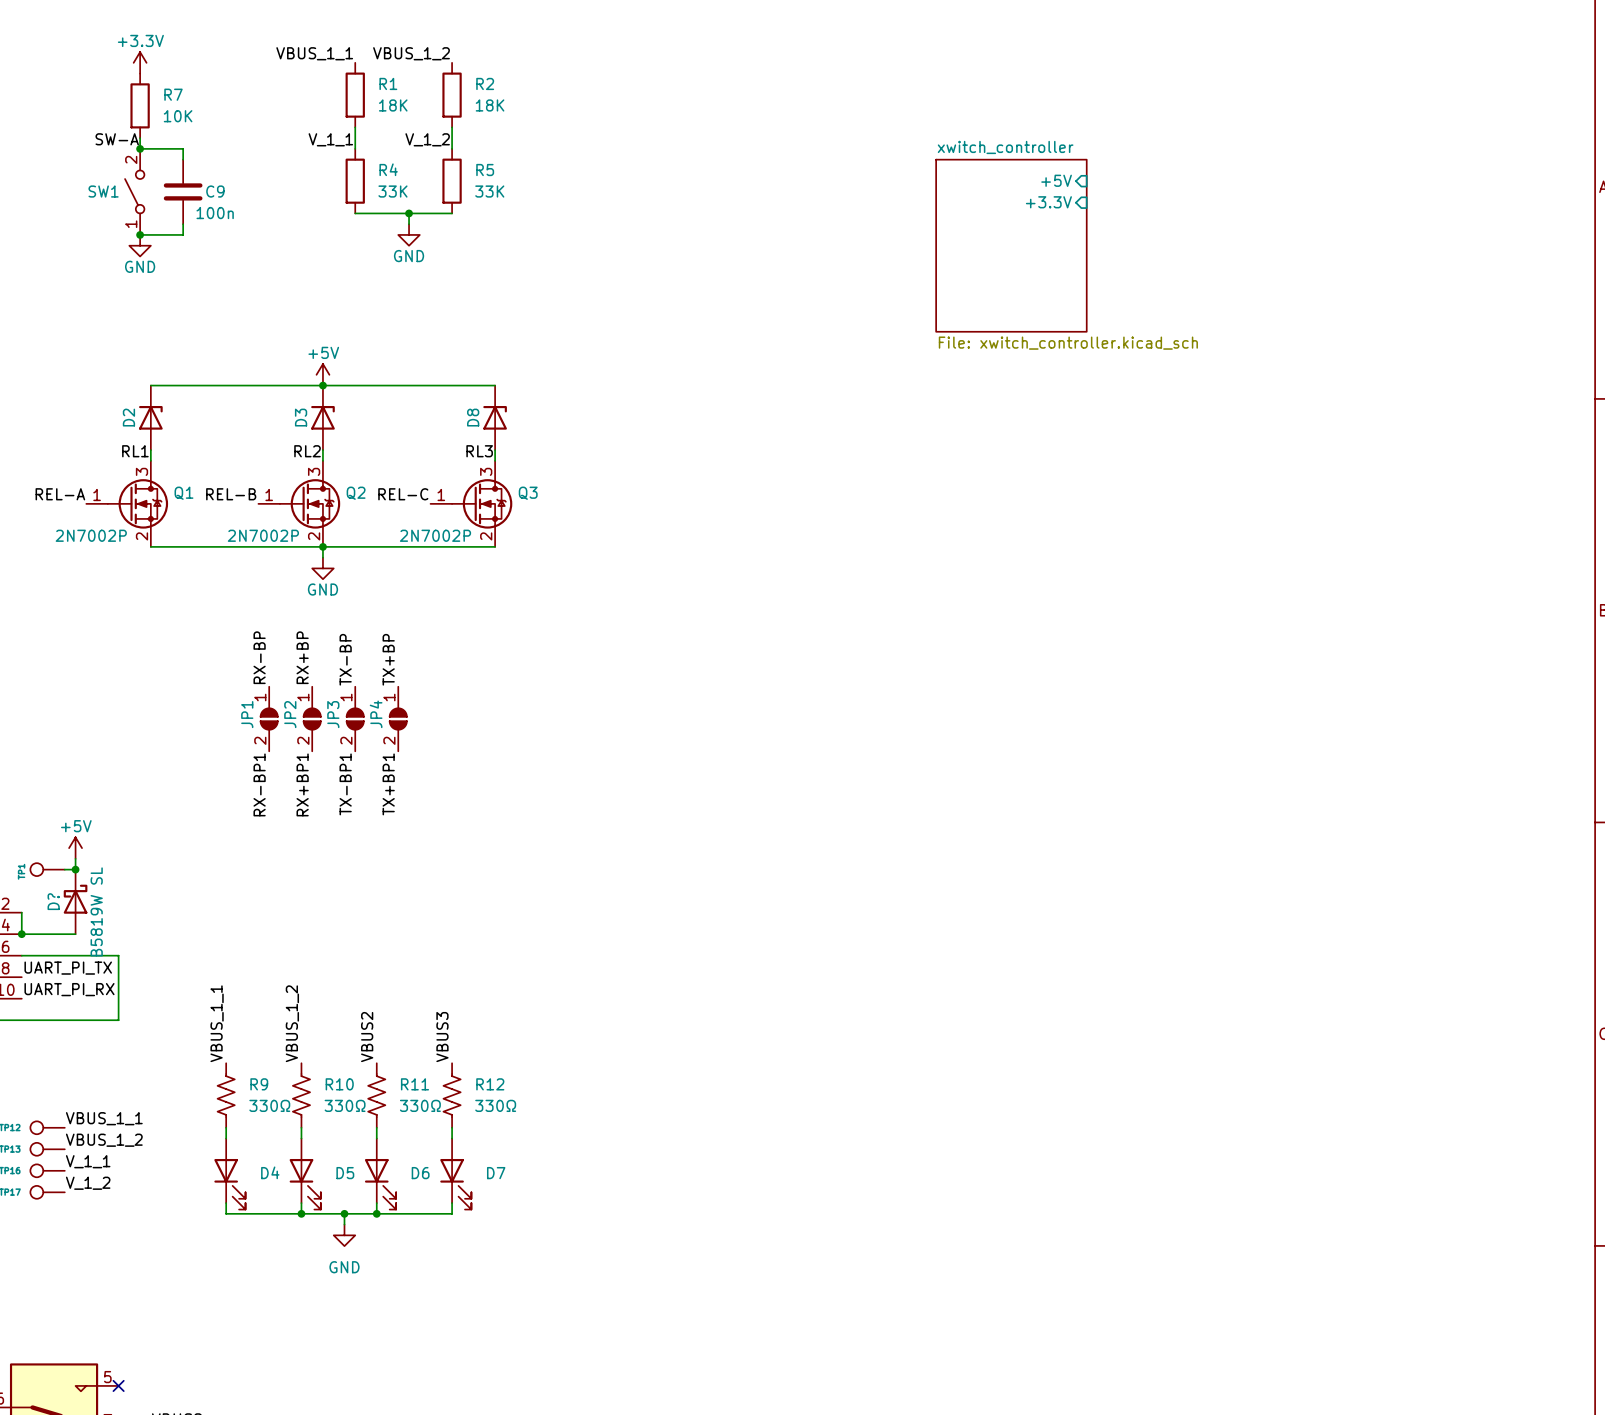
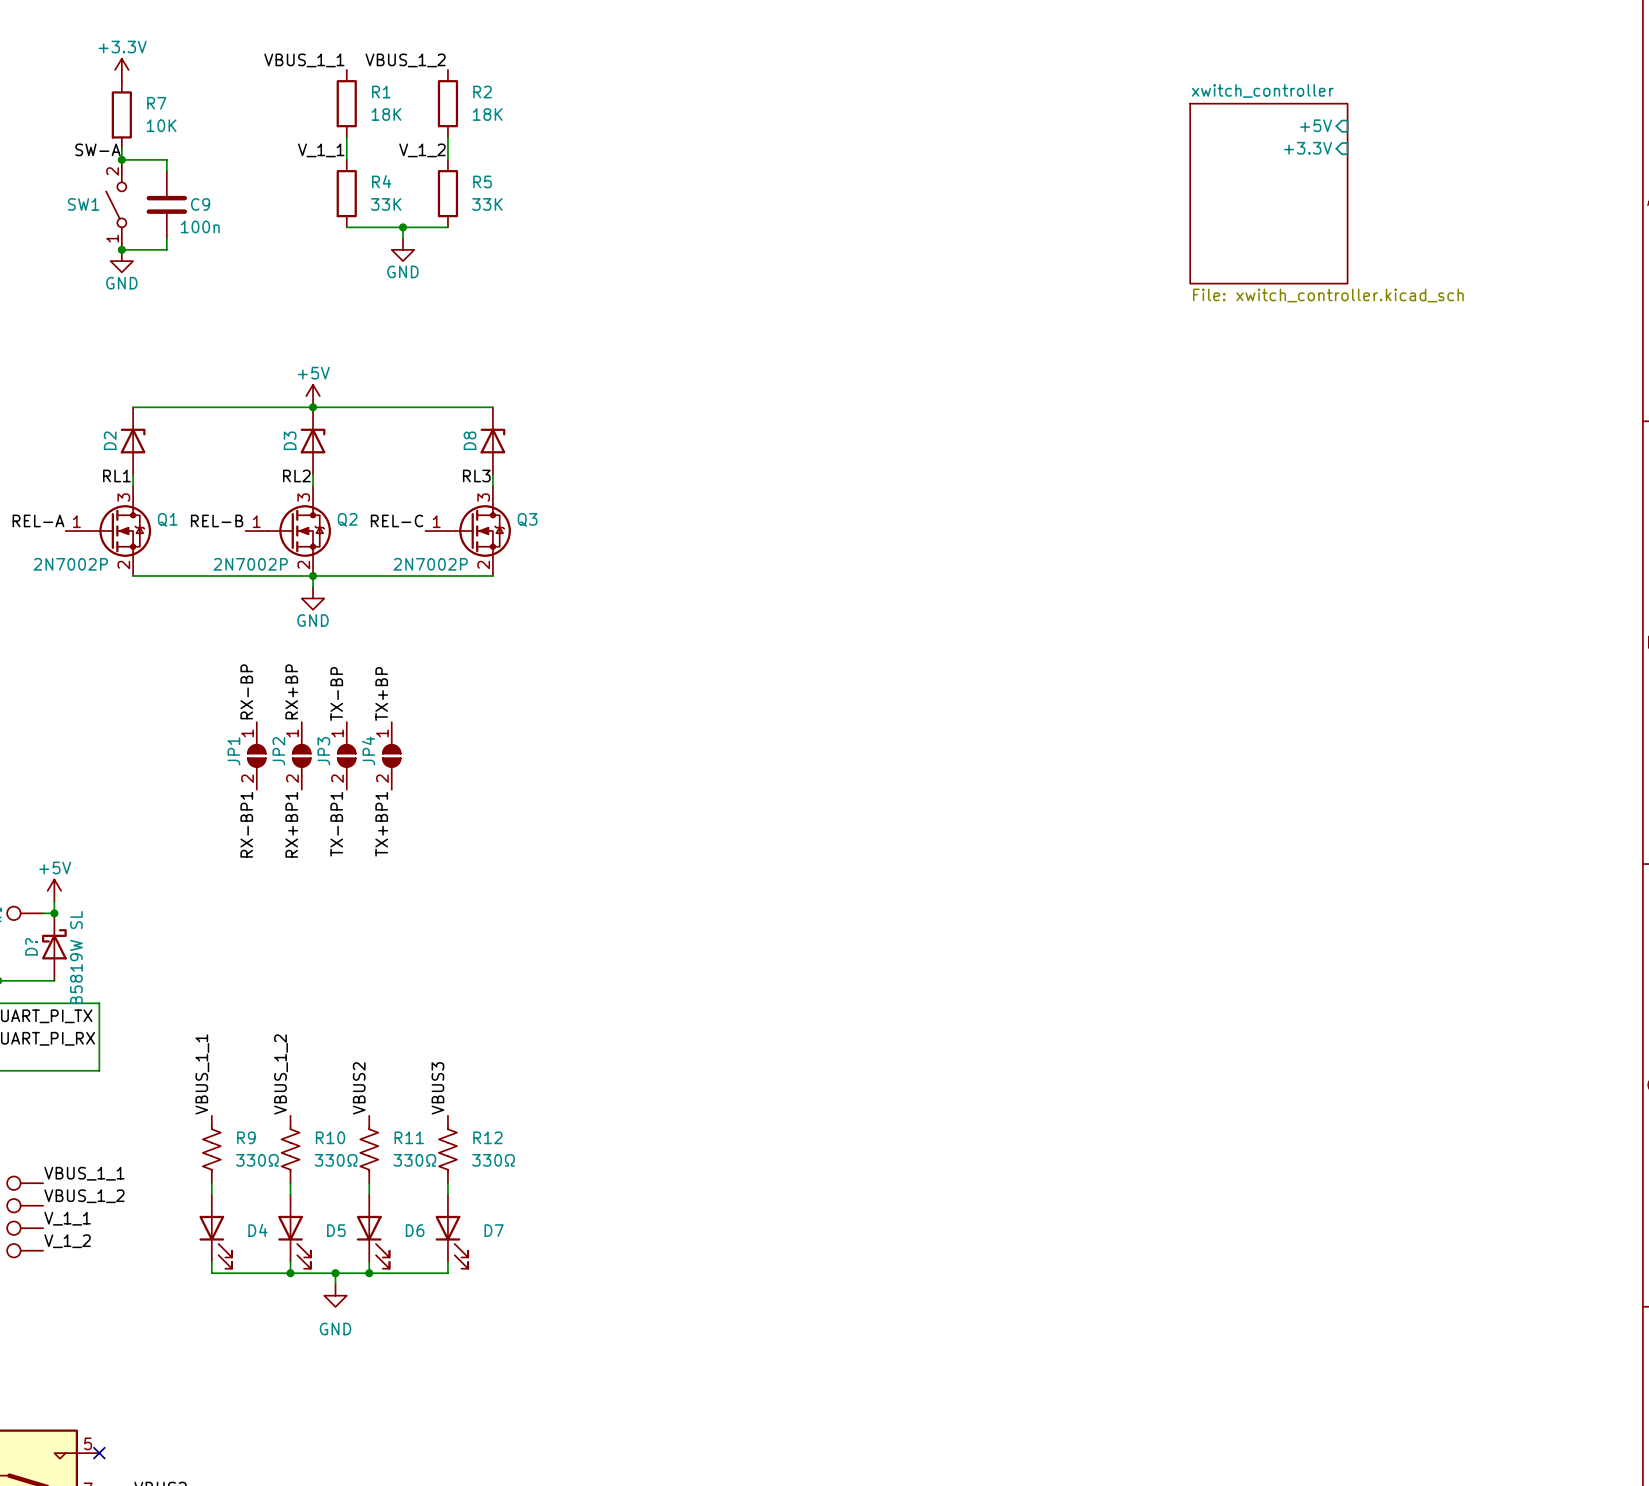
sheet pin: none -> +5V (1316, 125)
sheet pin: none -> +3.3V (1308, 148)
sheet pin: +5V (1056, 180) -> none
sheet xwitch_controller: none -> File: xwitch_controller.kicad_sch (1268, 193)
sheet pin: +3.3V (1048, 202) -> none
sheet xwitch_controller: File: xwitch_controller.kicad_sch (1011, 245) -> none

